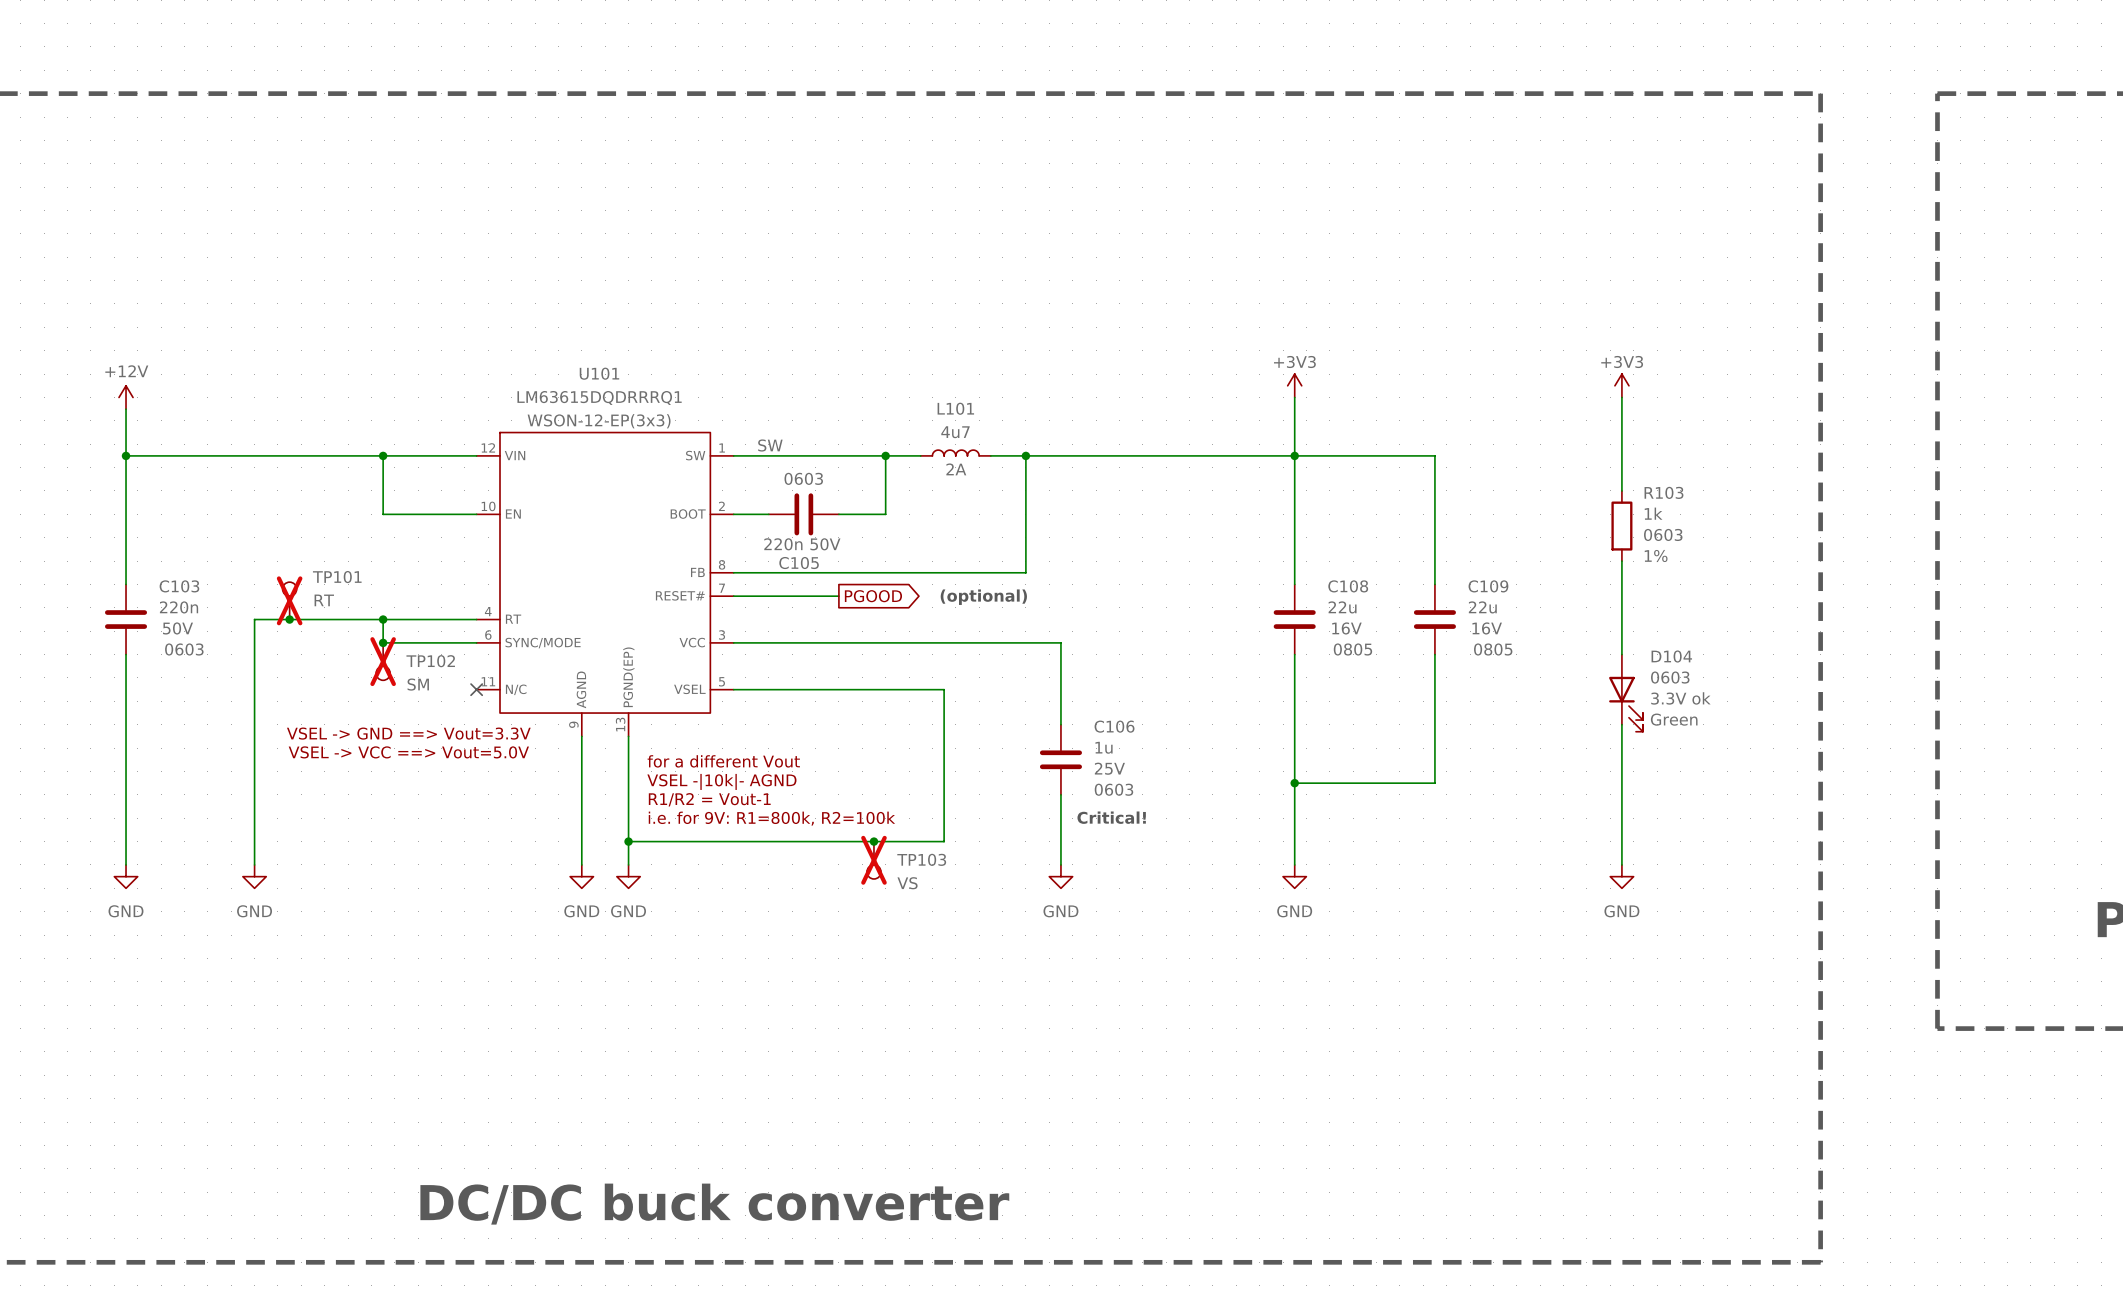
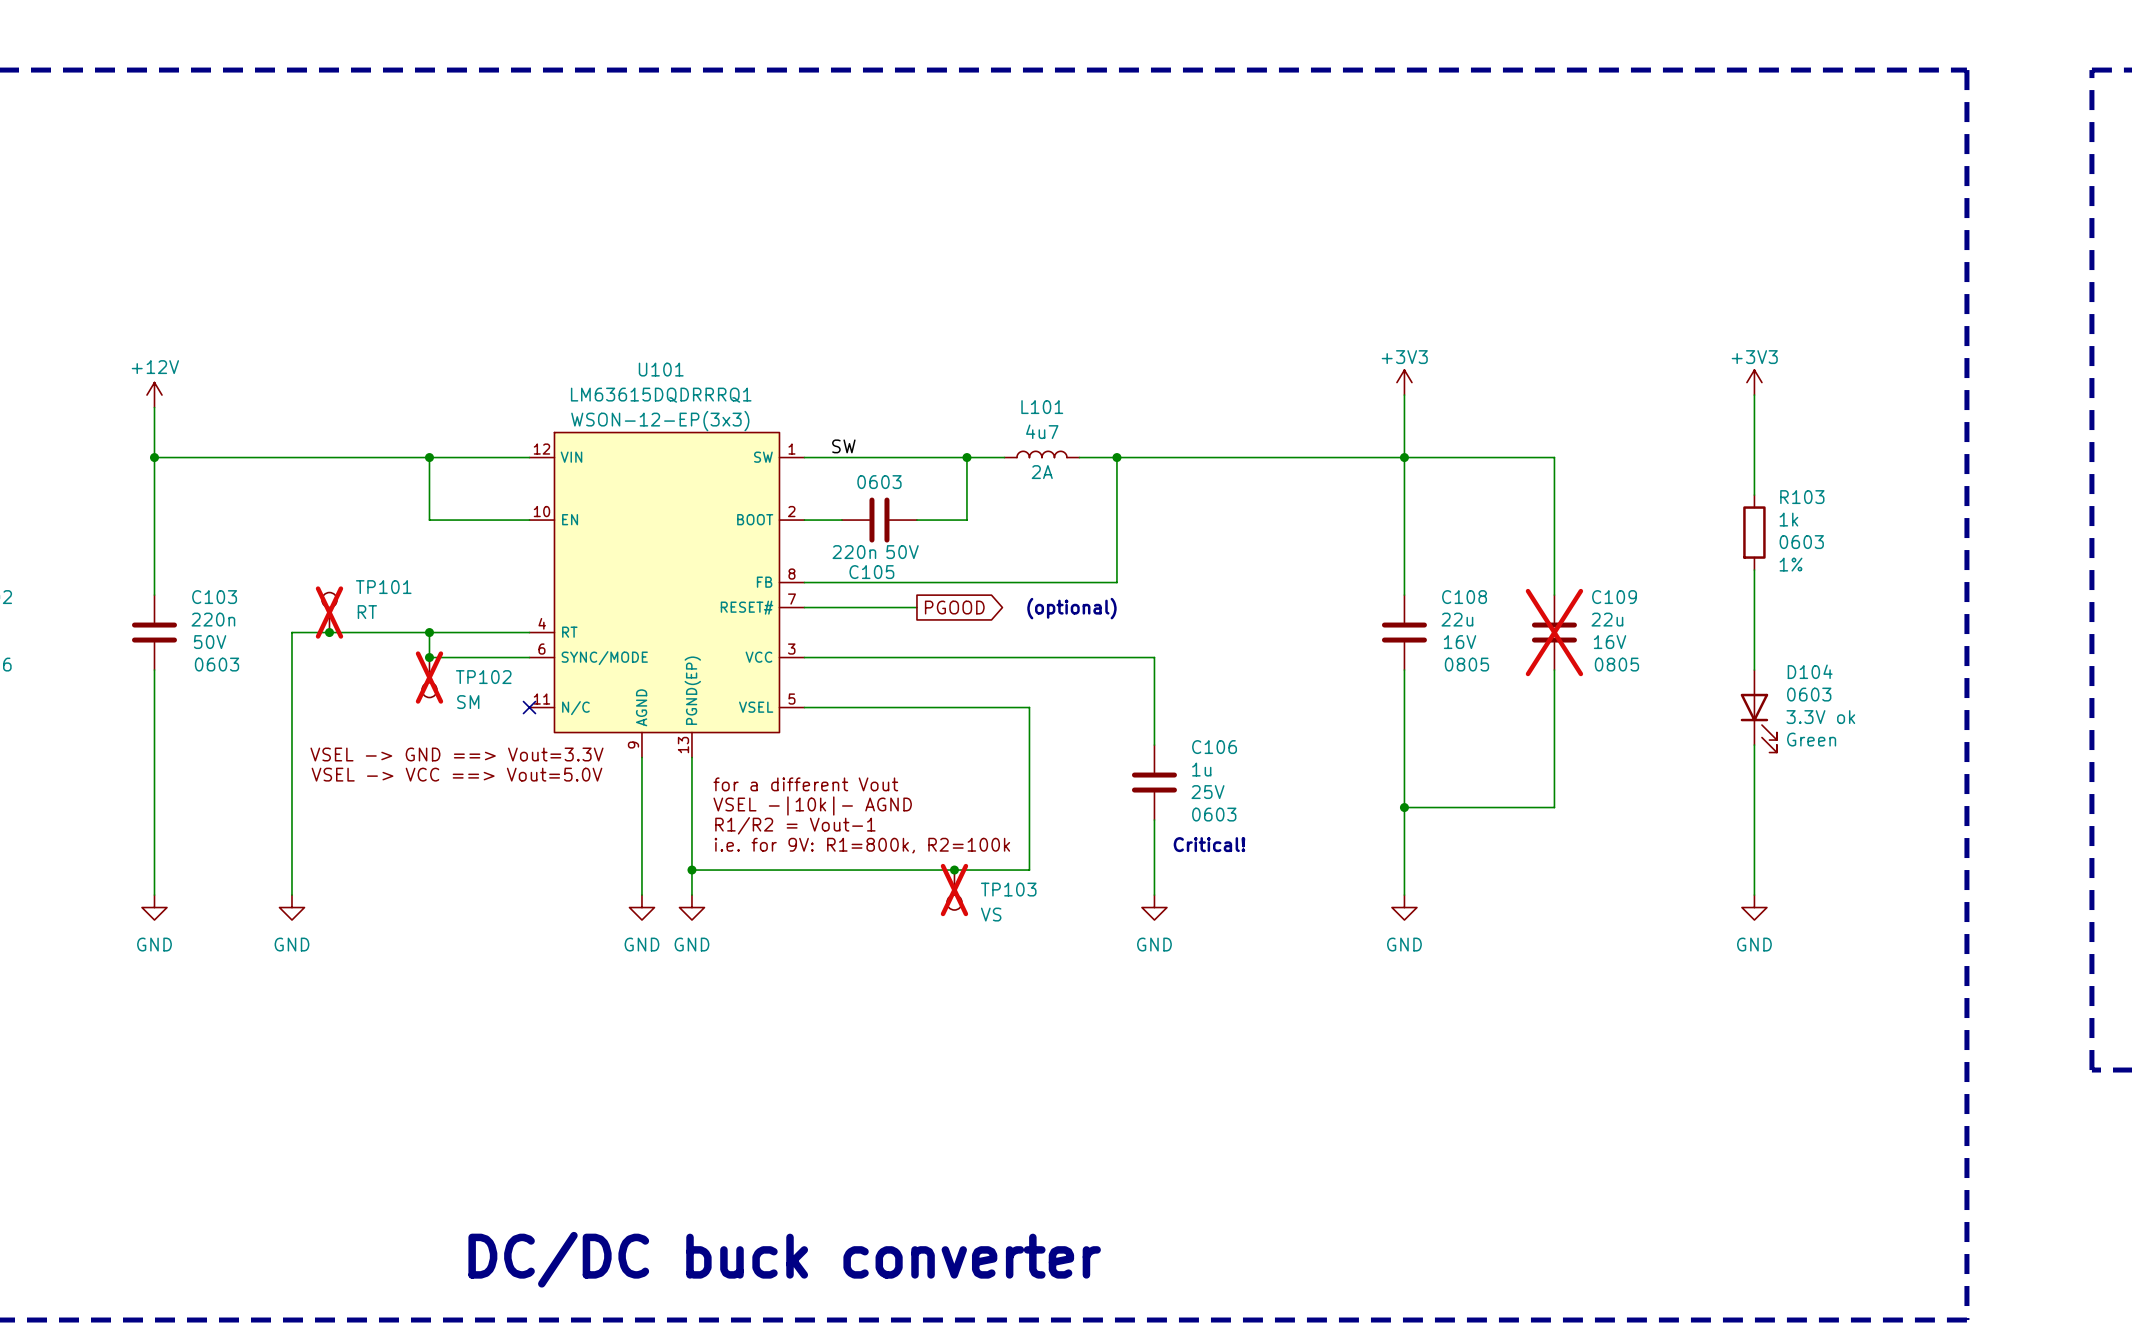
C109 do-not-place cross: none -> (1554, 632)

